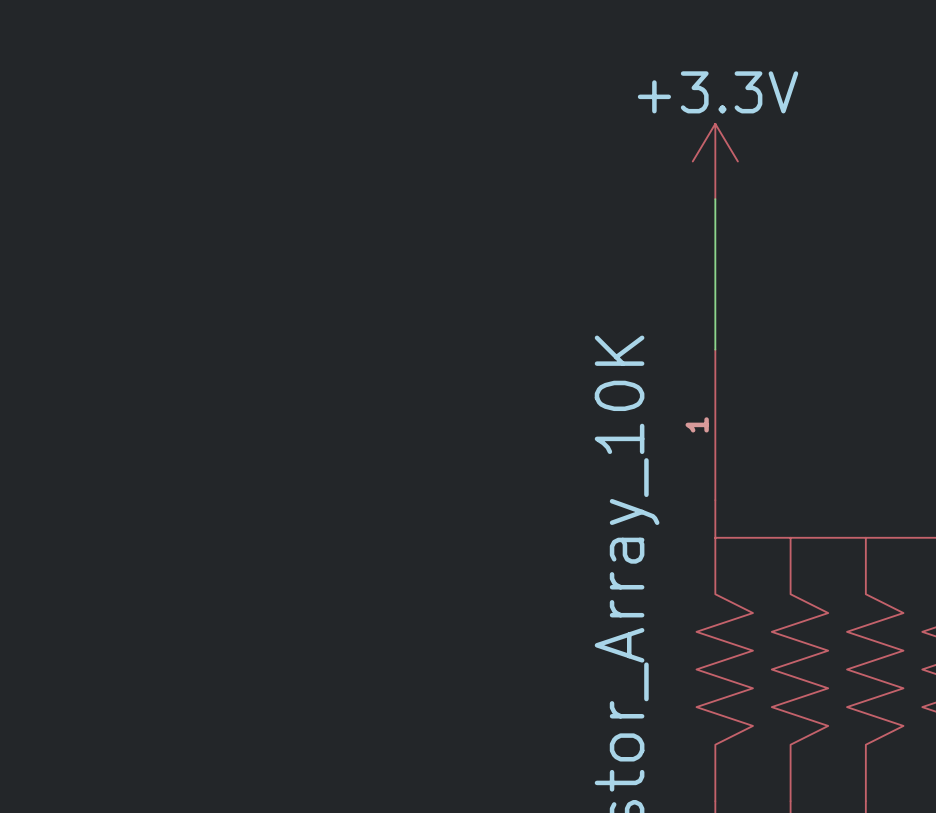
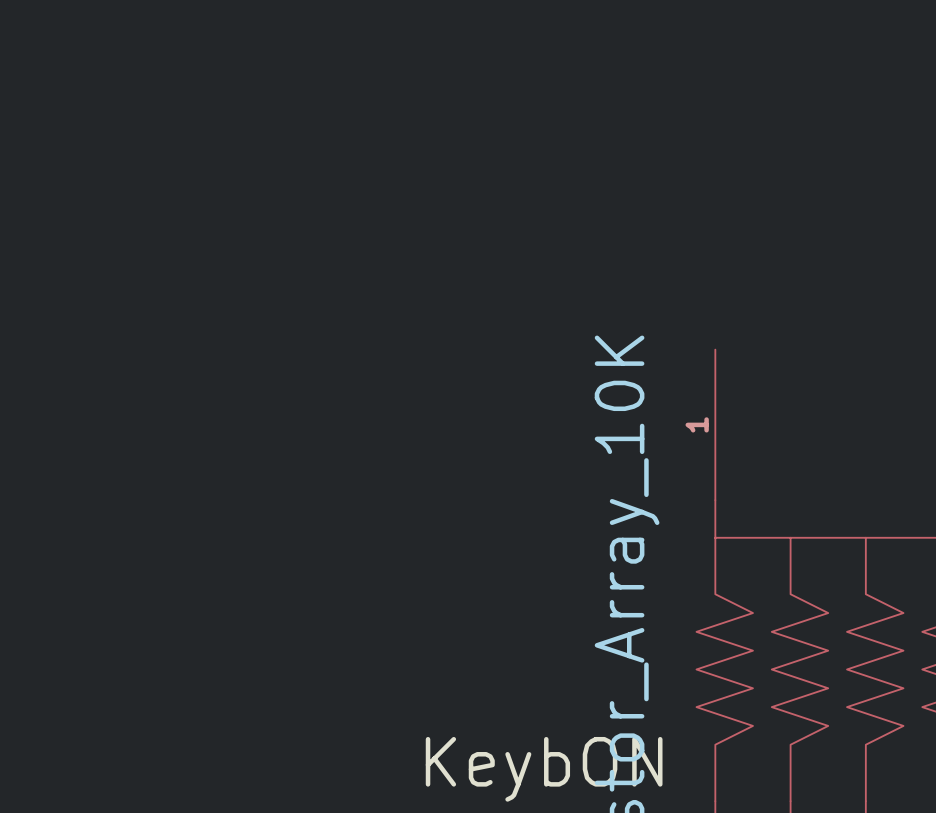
power symbol: +3.3V (715, 161) -> none
wire: (715, 199) (715, 349) -> none
label: none -> KeybON (544, 769)

